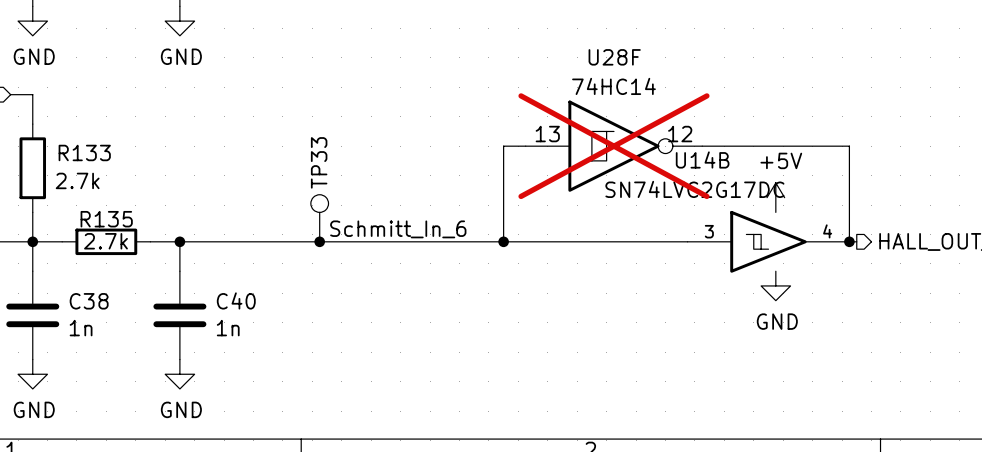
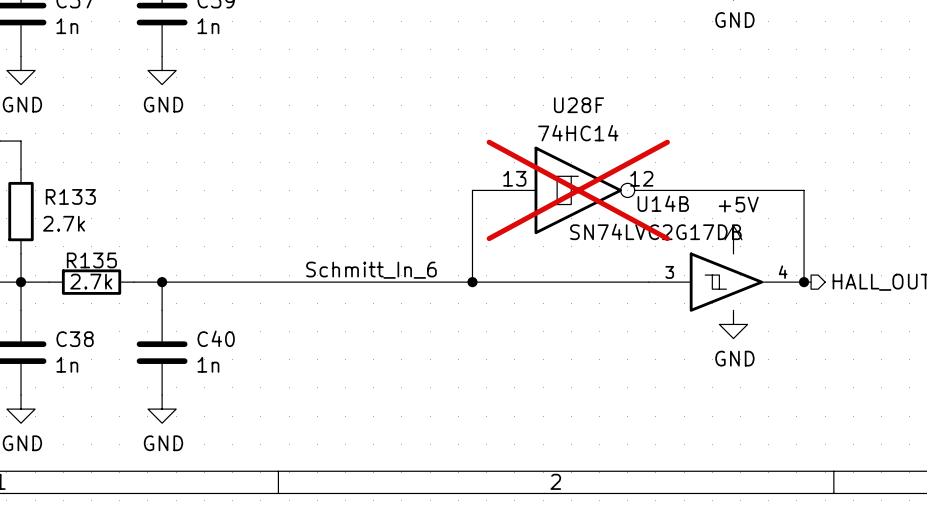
U14B value: SN74LVC2G17DC (694, 189) -> SN74LVC2G17DB (655, 231)
TP33: (319, 218) -> none
junction: (319, 241) -> none

